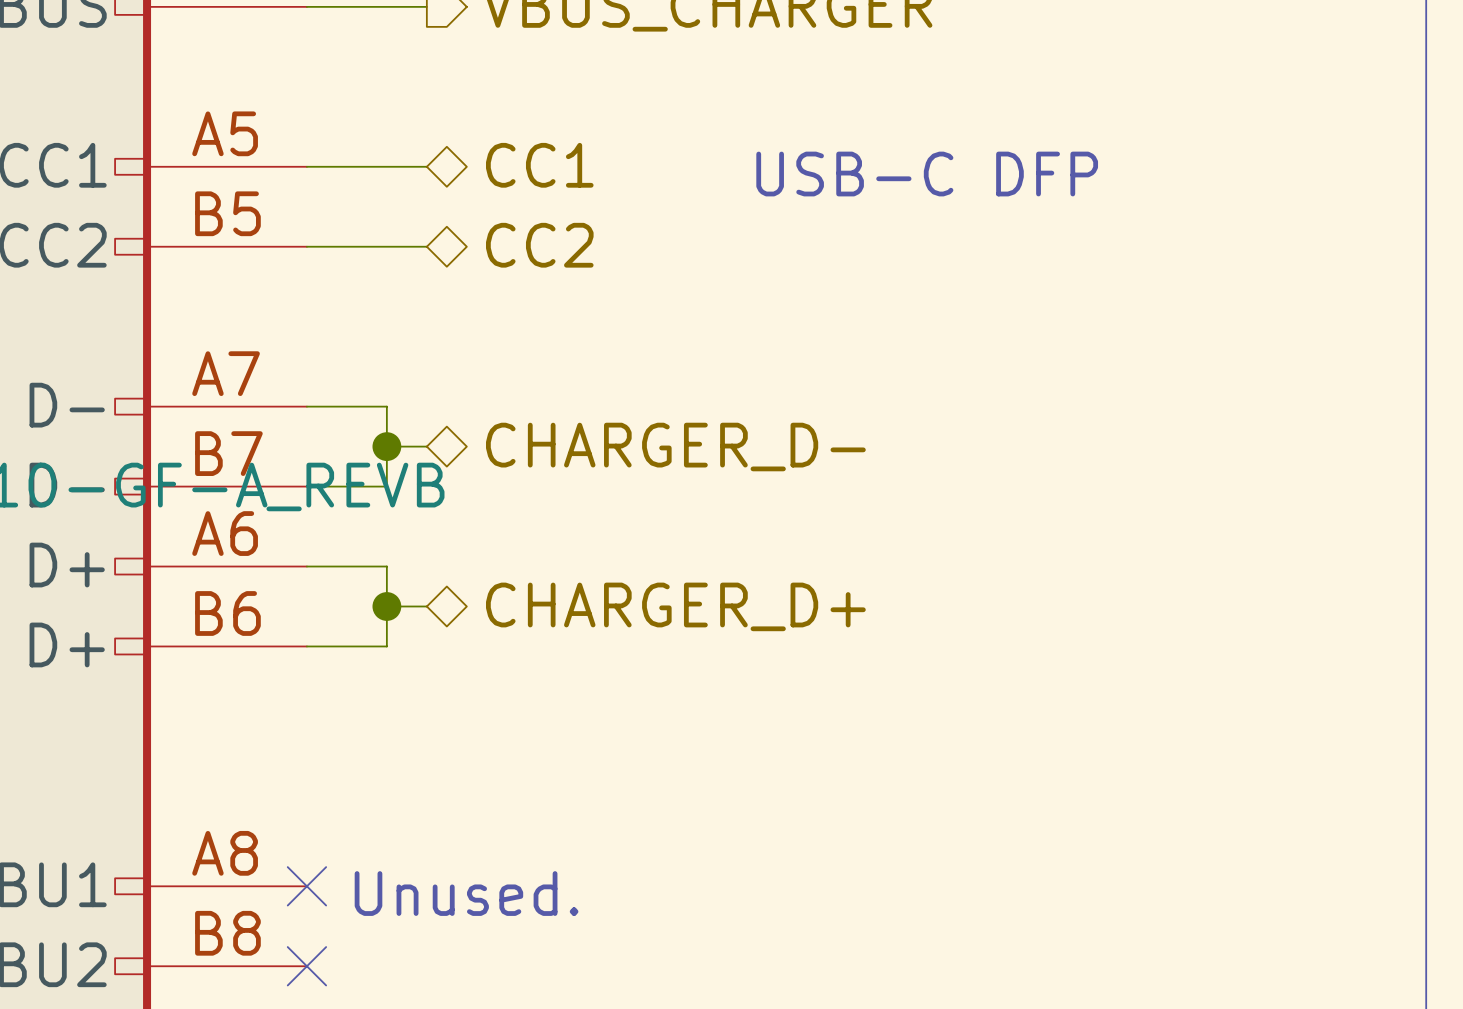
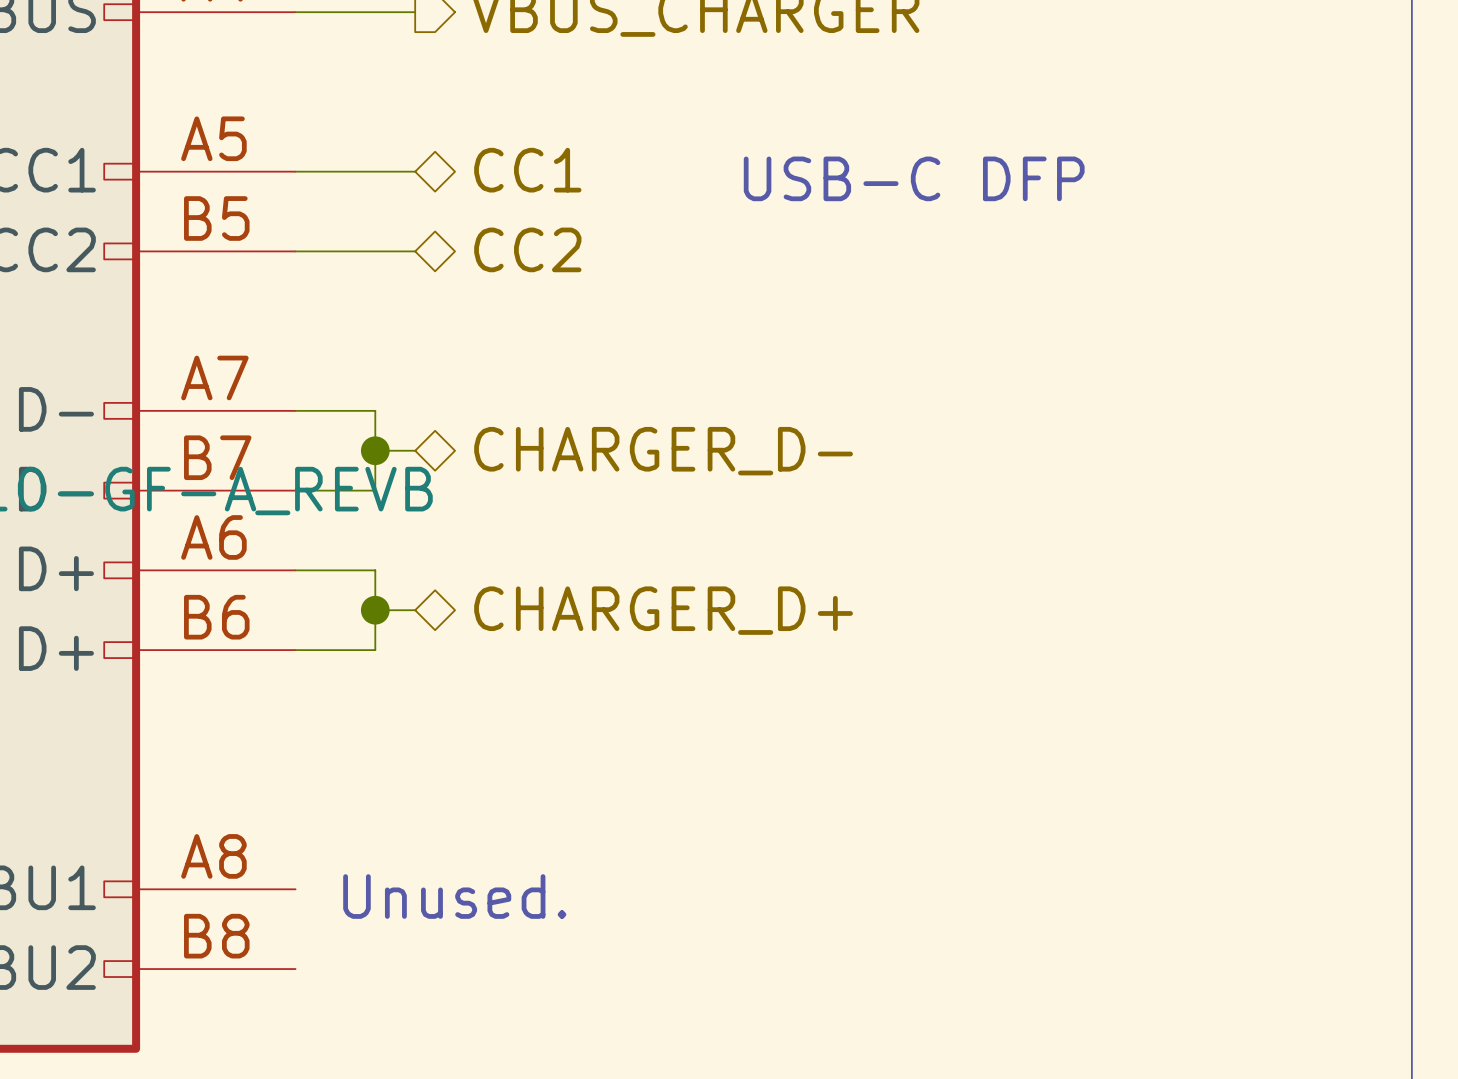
no-connect mark: (306, 886) -> none
no-connect mark: (306, 966) -> none

